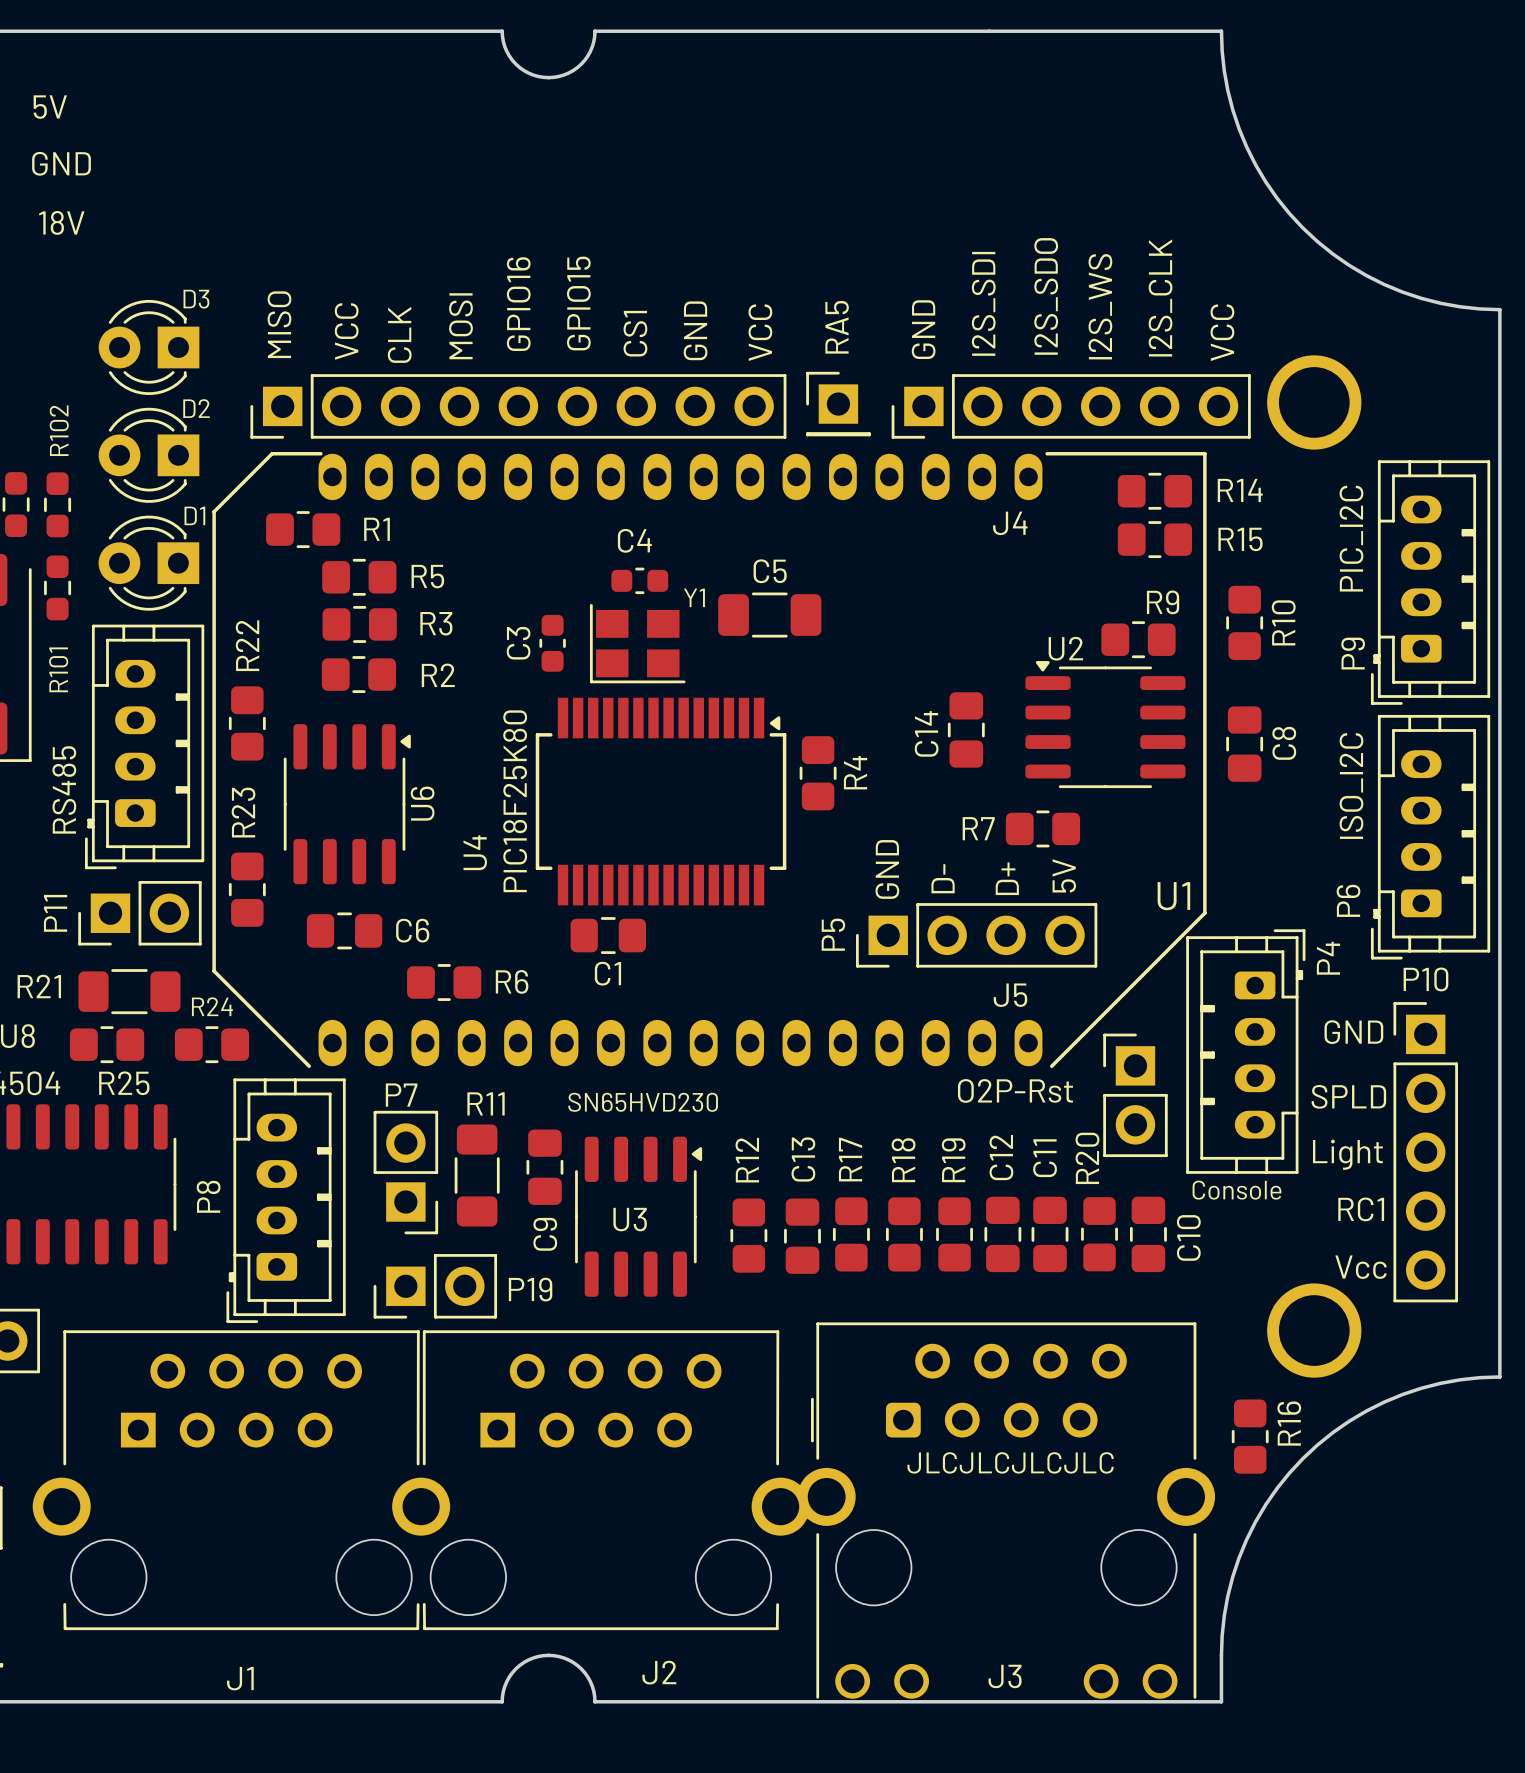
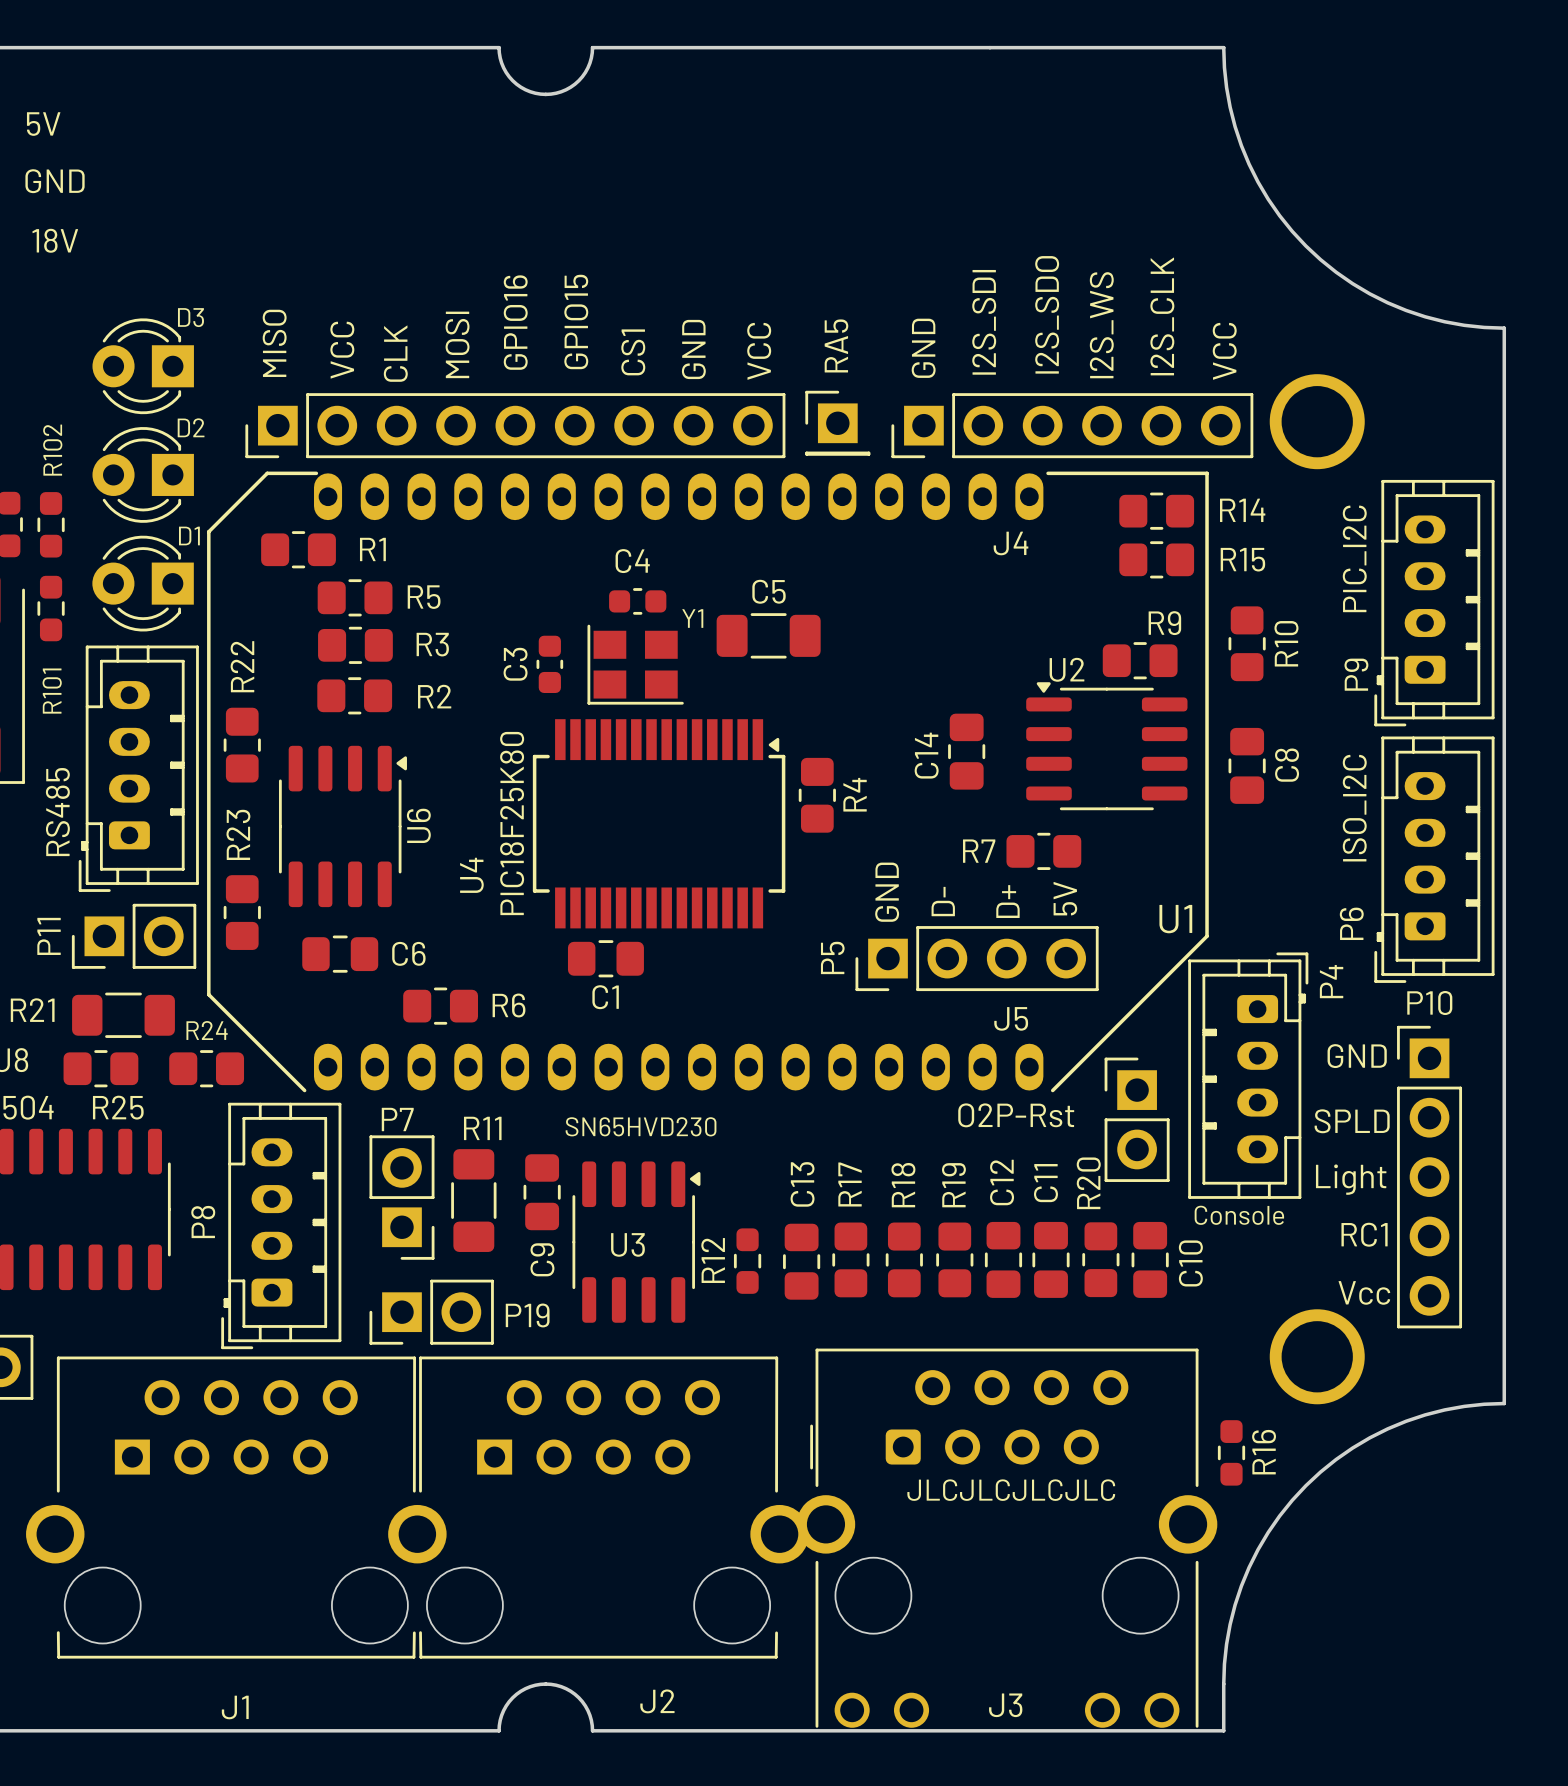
R12 name position: R12 (747, 1160) -> R12 (713, 1260)
R12 footprint: [730, 1198, 768, 1273] -> [733, 1228, 762, 1294]
R16 footprint: [1231, 1399, 1269, 1474] -> [1217, 1420, 1246, 1486]

